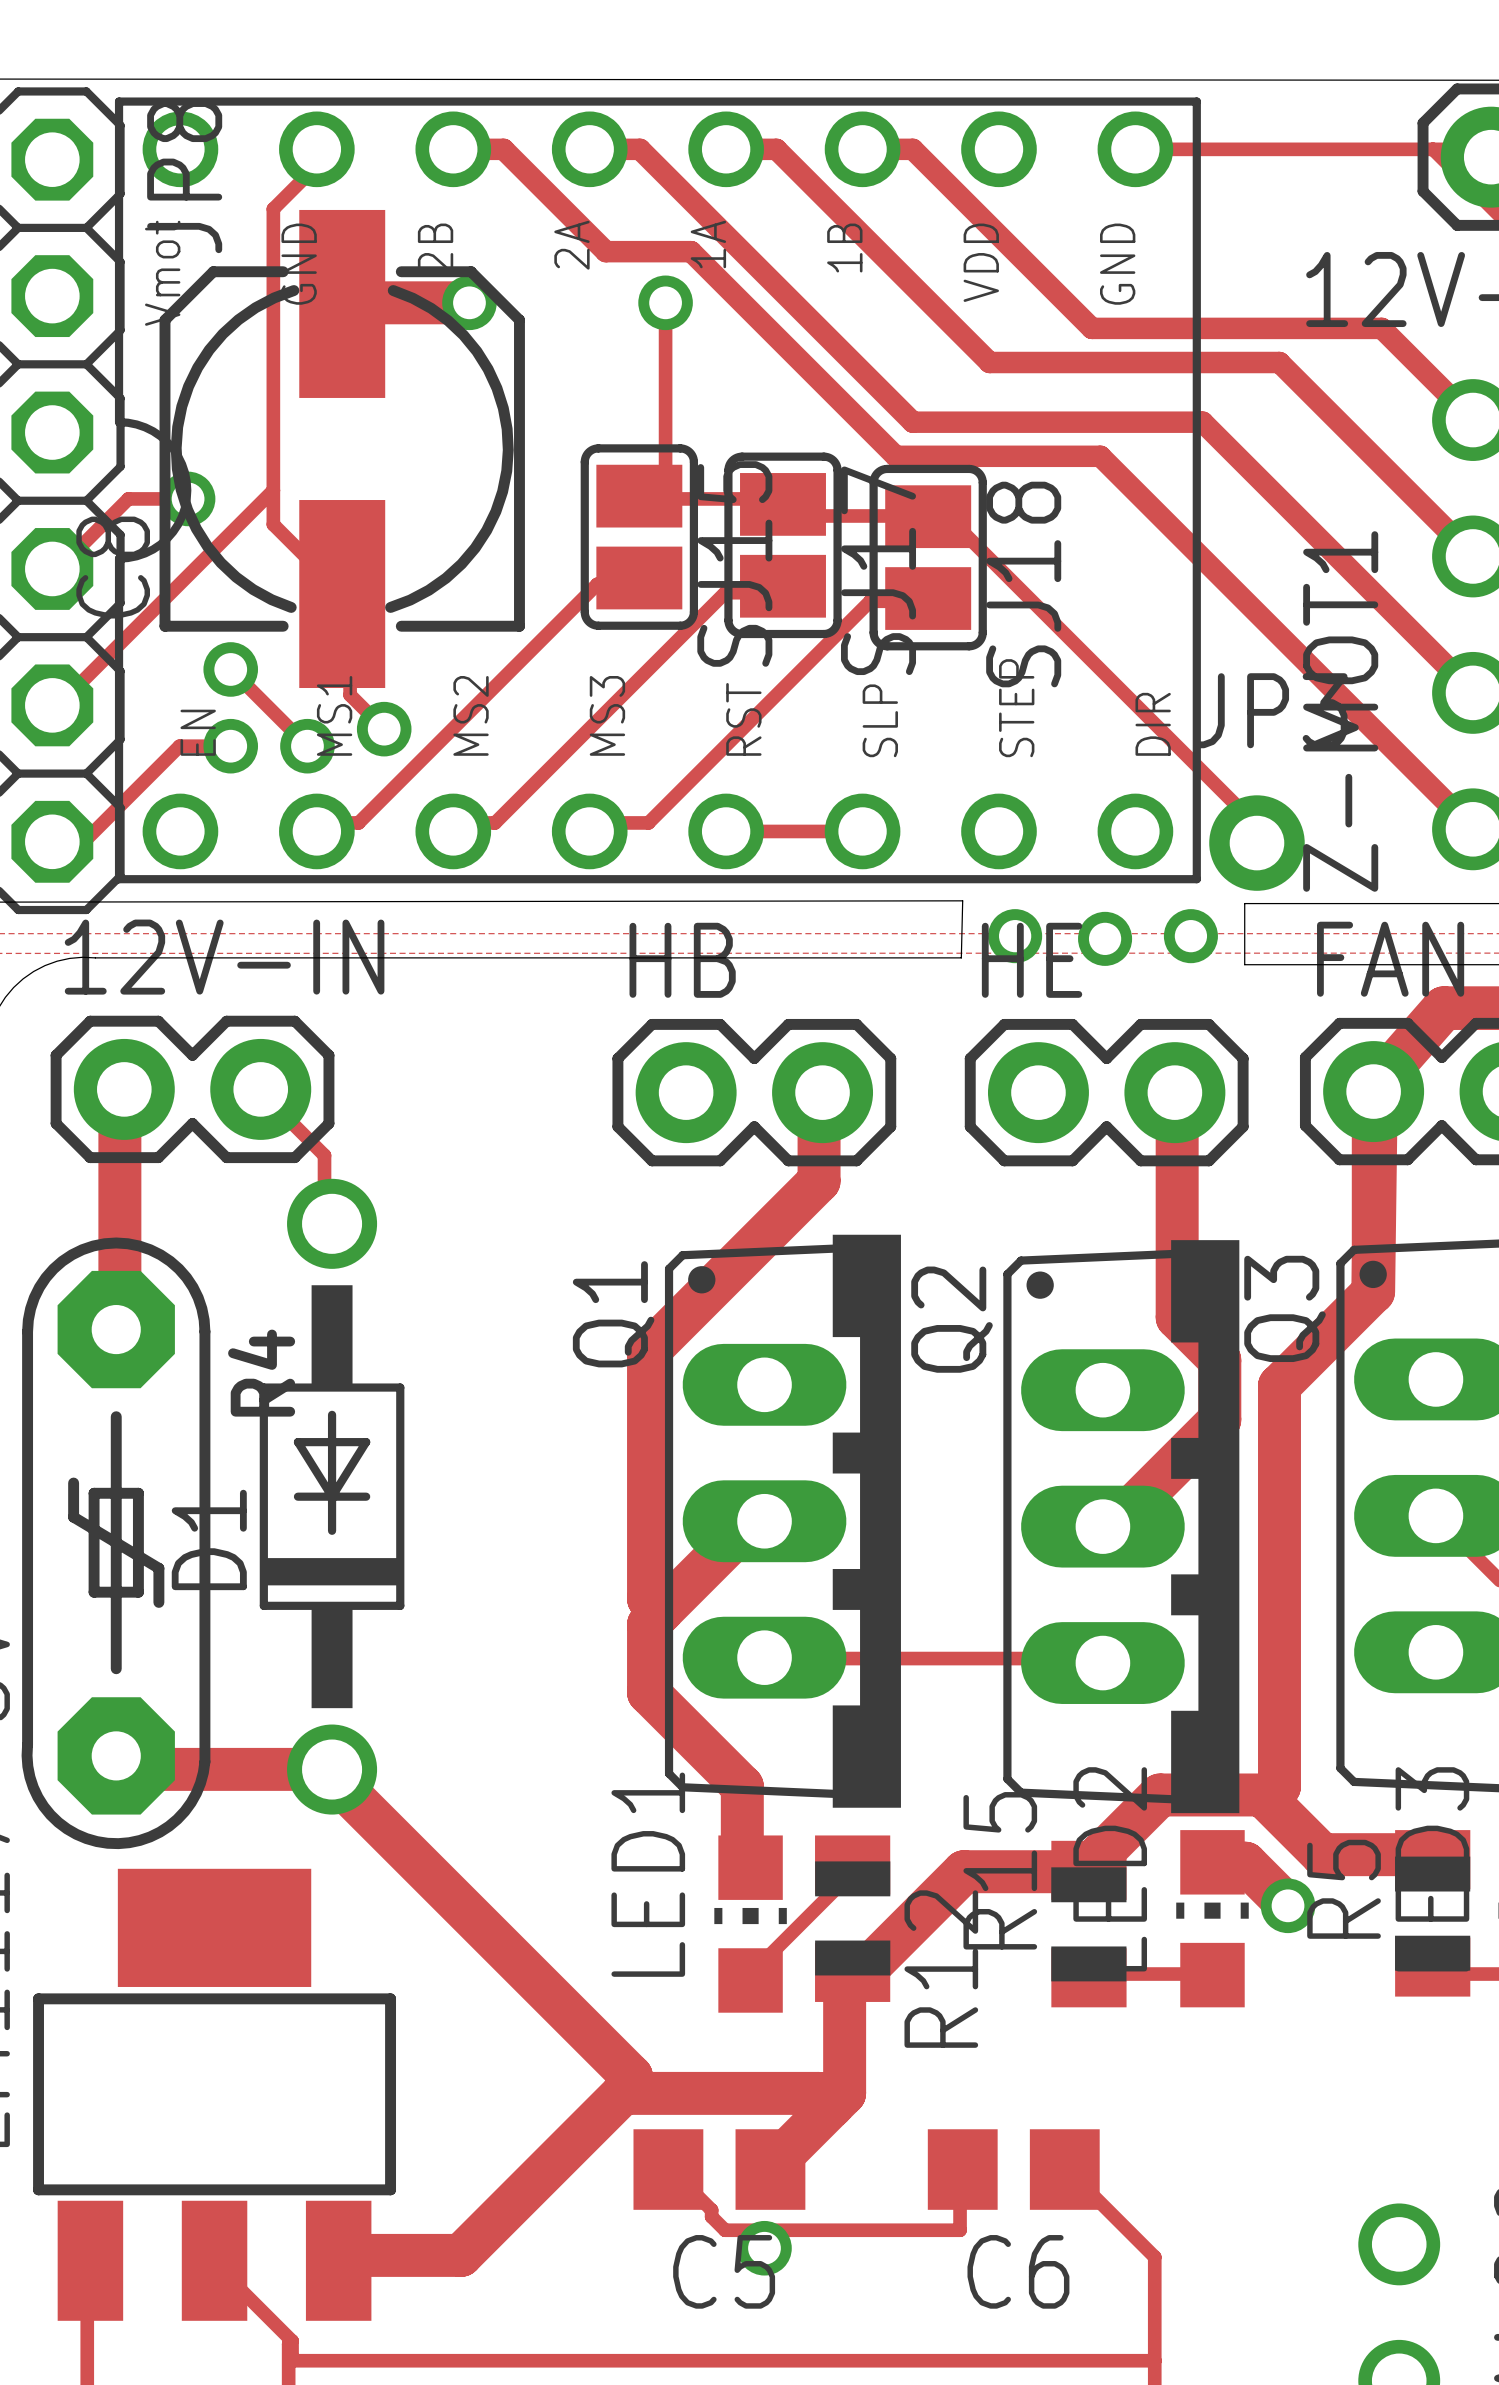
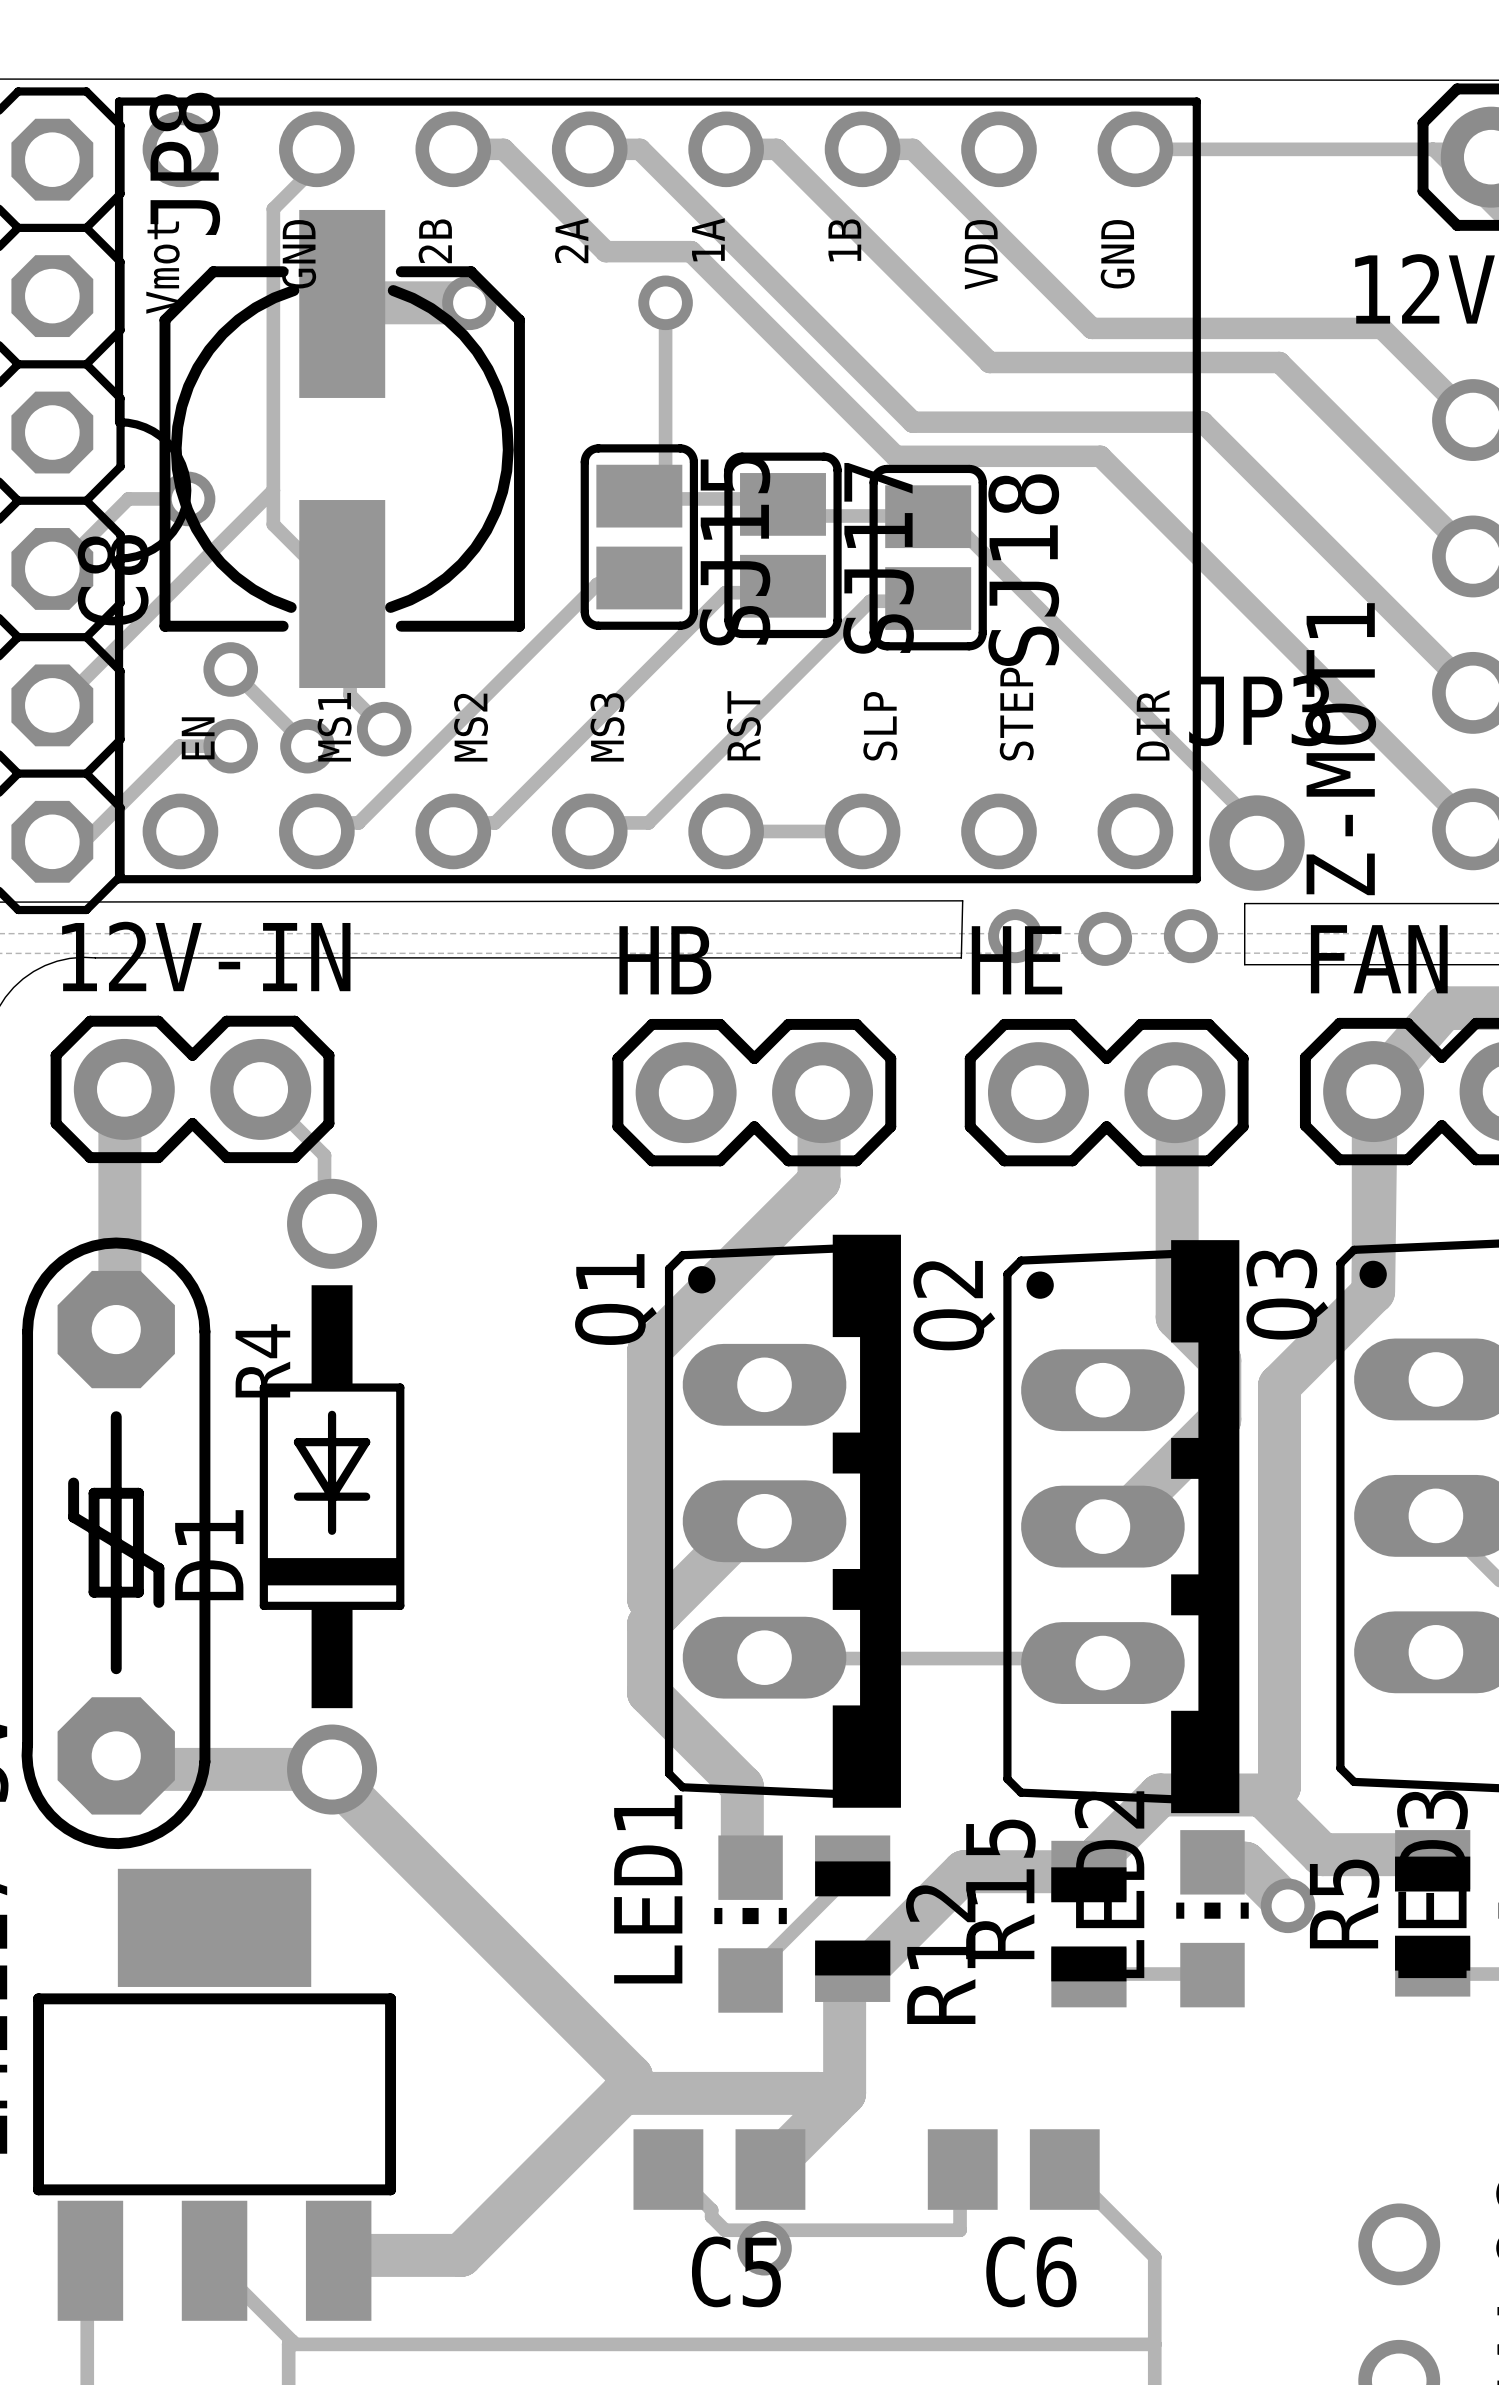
track: (292, 2341) (292, 2360) (1154, 2360) -> (292, 2341) (295, 2344) (1154, 2344)

